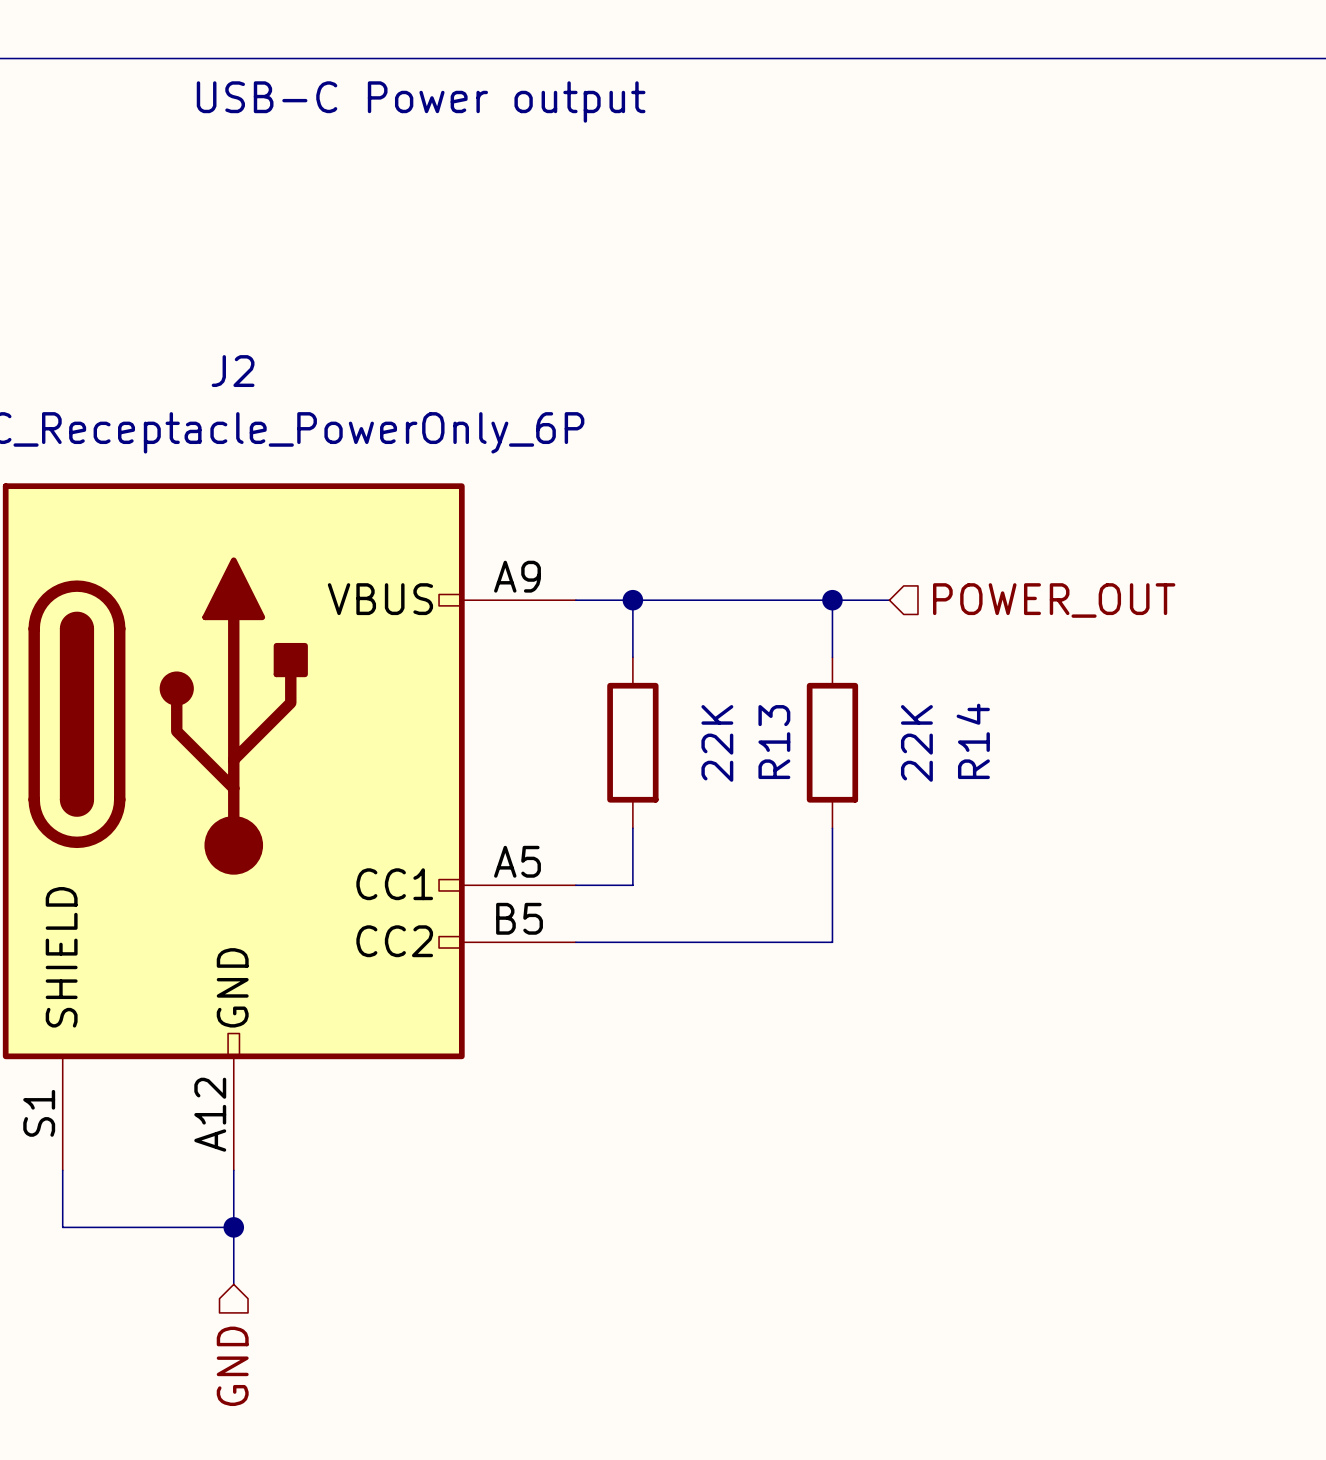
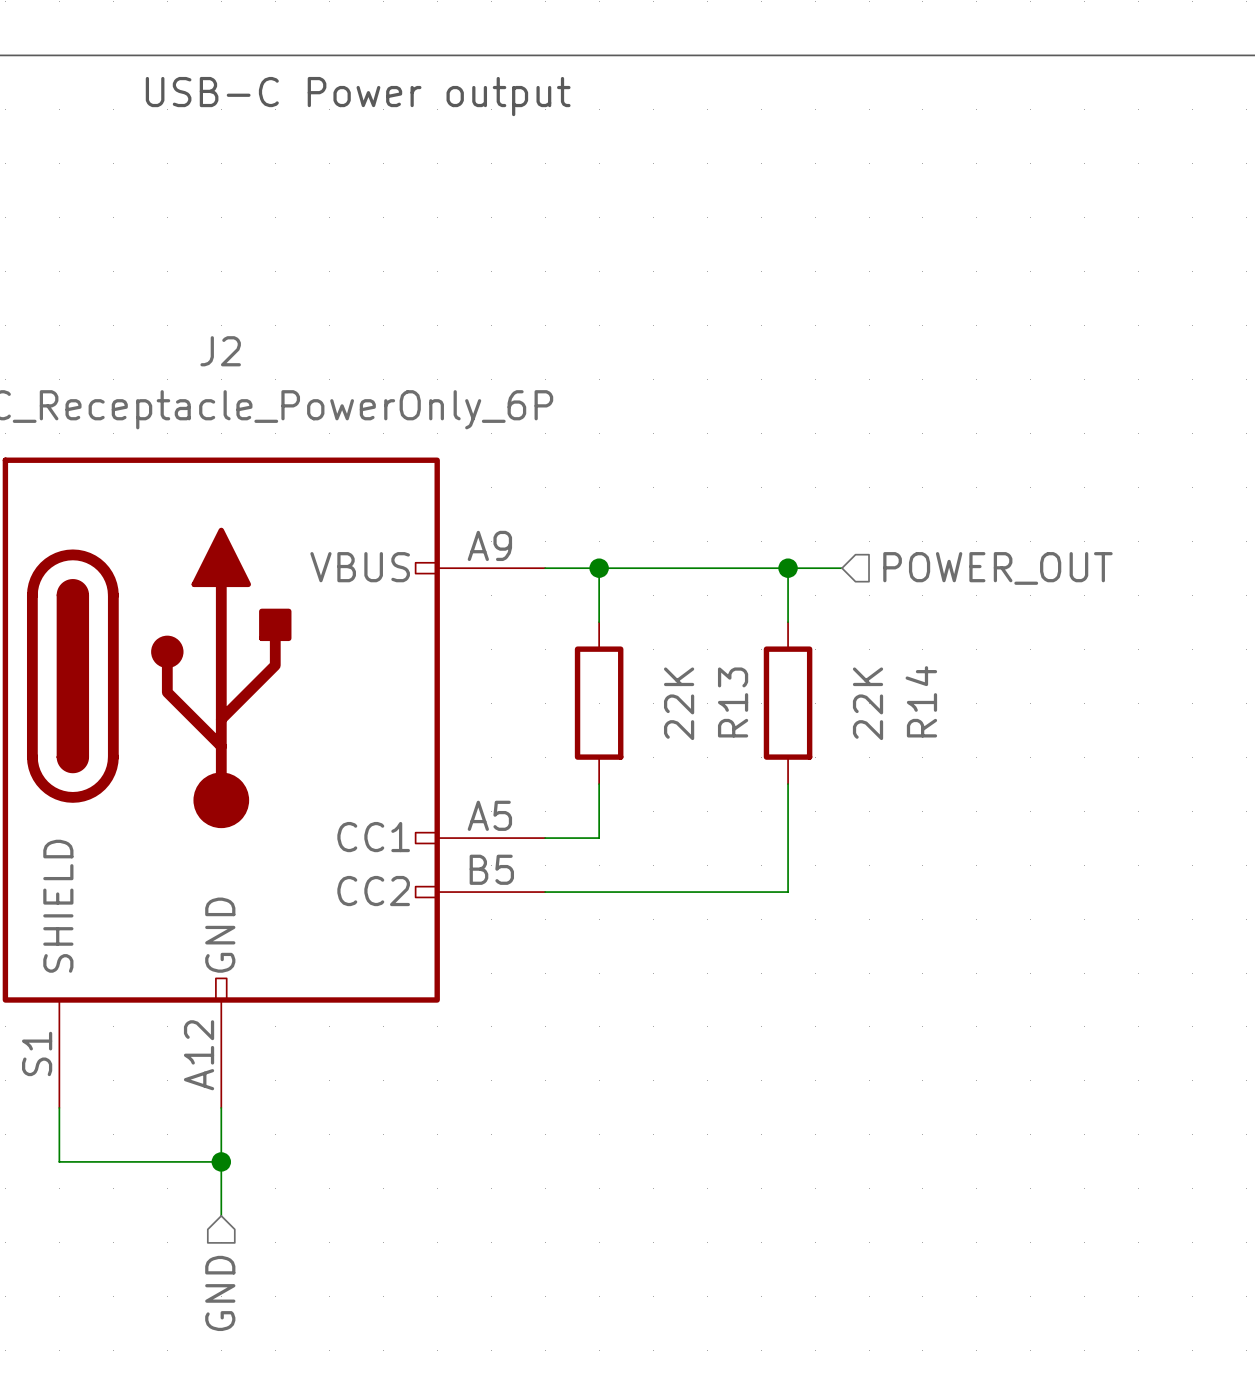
text position: USB-C Power output (421, 101) -> USB-C Power output (358, 96)

